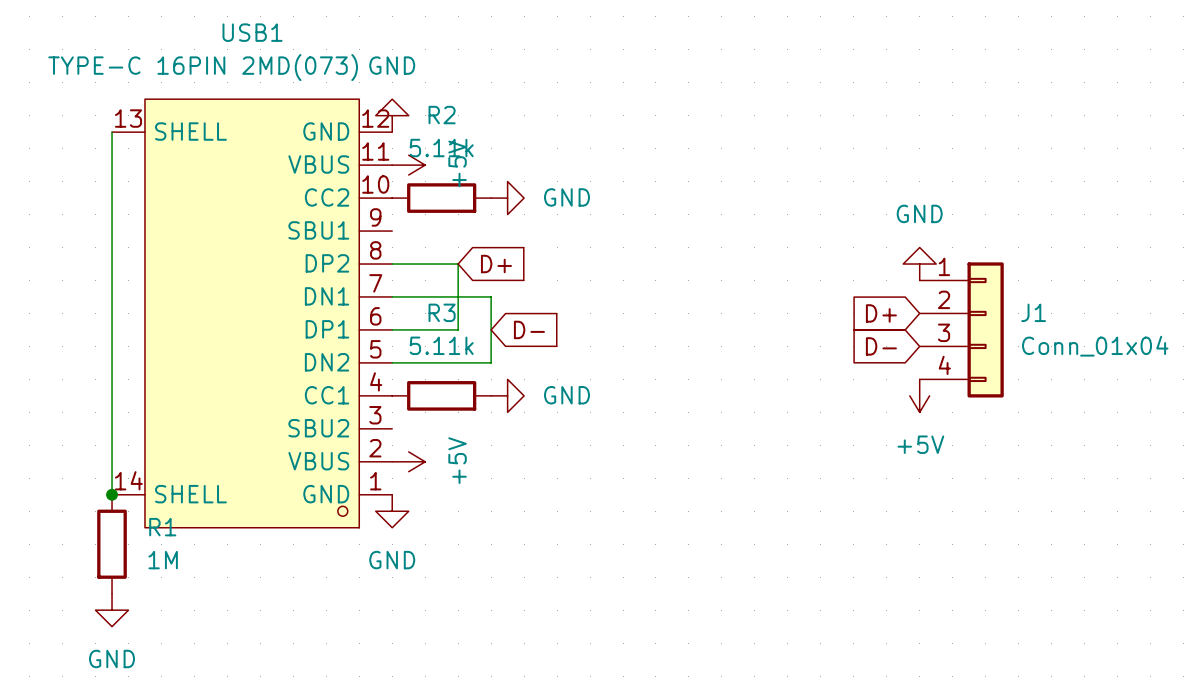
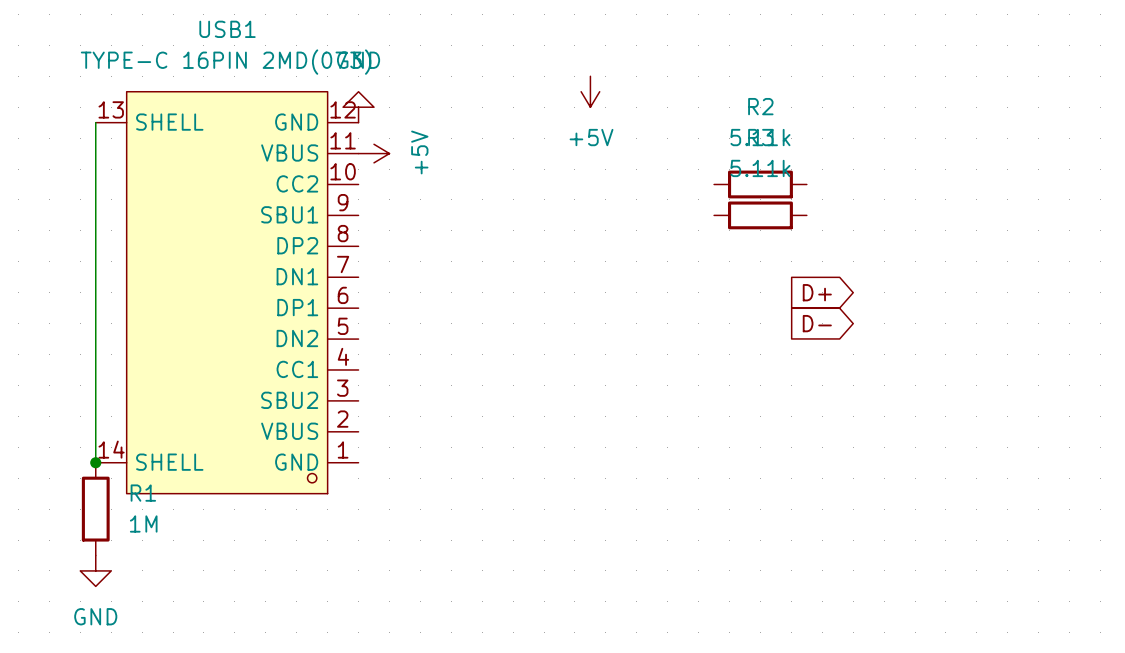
USB1 value position: TYPE-C 16PIN 2MD(073) (203, 67) -> TYPE-C 16PIN 2MD(073) (226, 62)
power symbol: none -> +5V (590, 91)
R2 position: (441, 198) -> (760, 184)
power symbol: GND (507, 198) -> none
wire: (392, 264) (458, 264) (458, 329) (392, 329) -> none
global label: D+ (496, 264) -> none
power symbol: GND (919, 264) -> none
wire: (392, 296) (491, 296) (491, 362) (392, 362) -> none
global label: D- (529, 329) -> none
J1: Conn_01x04 (961, 329) -> none
R3 position: (441, 395) -> (760, 215)
power symbol: GND (507, 395) -> none
power symbol: +5V (919, 395) -> none
power symbol: +5V (408, 461) -> none
power symbol: GND (392, 511) -> none

